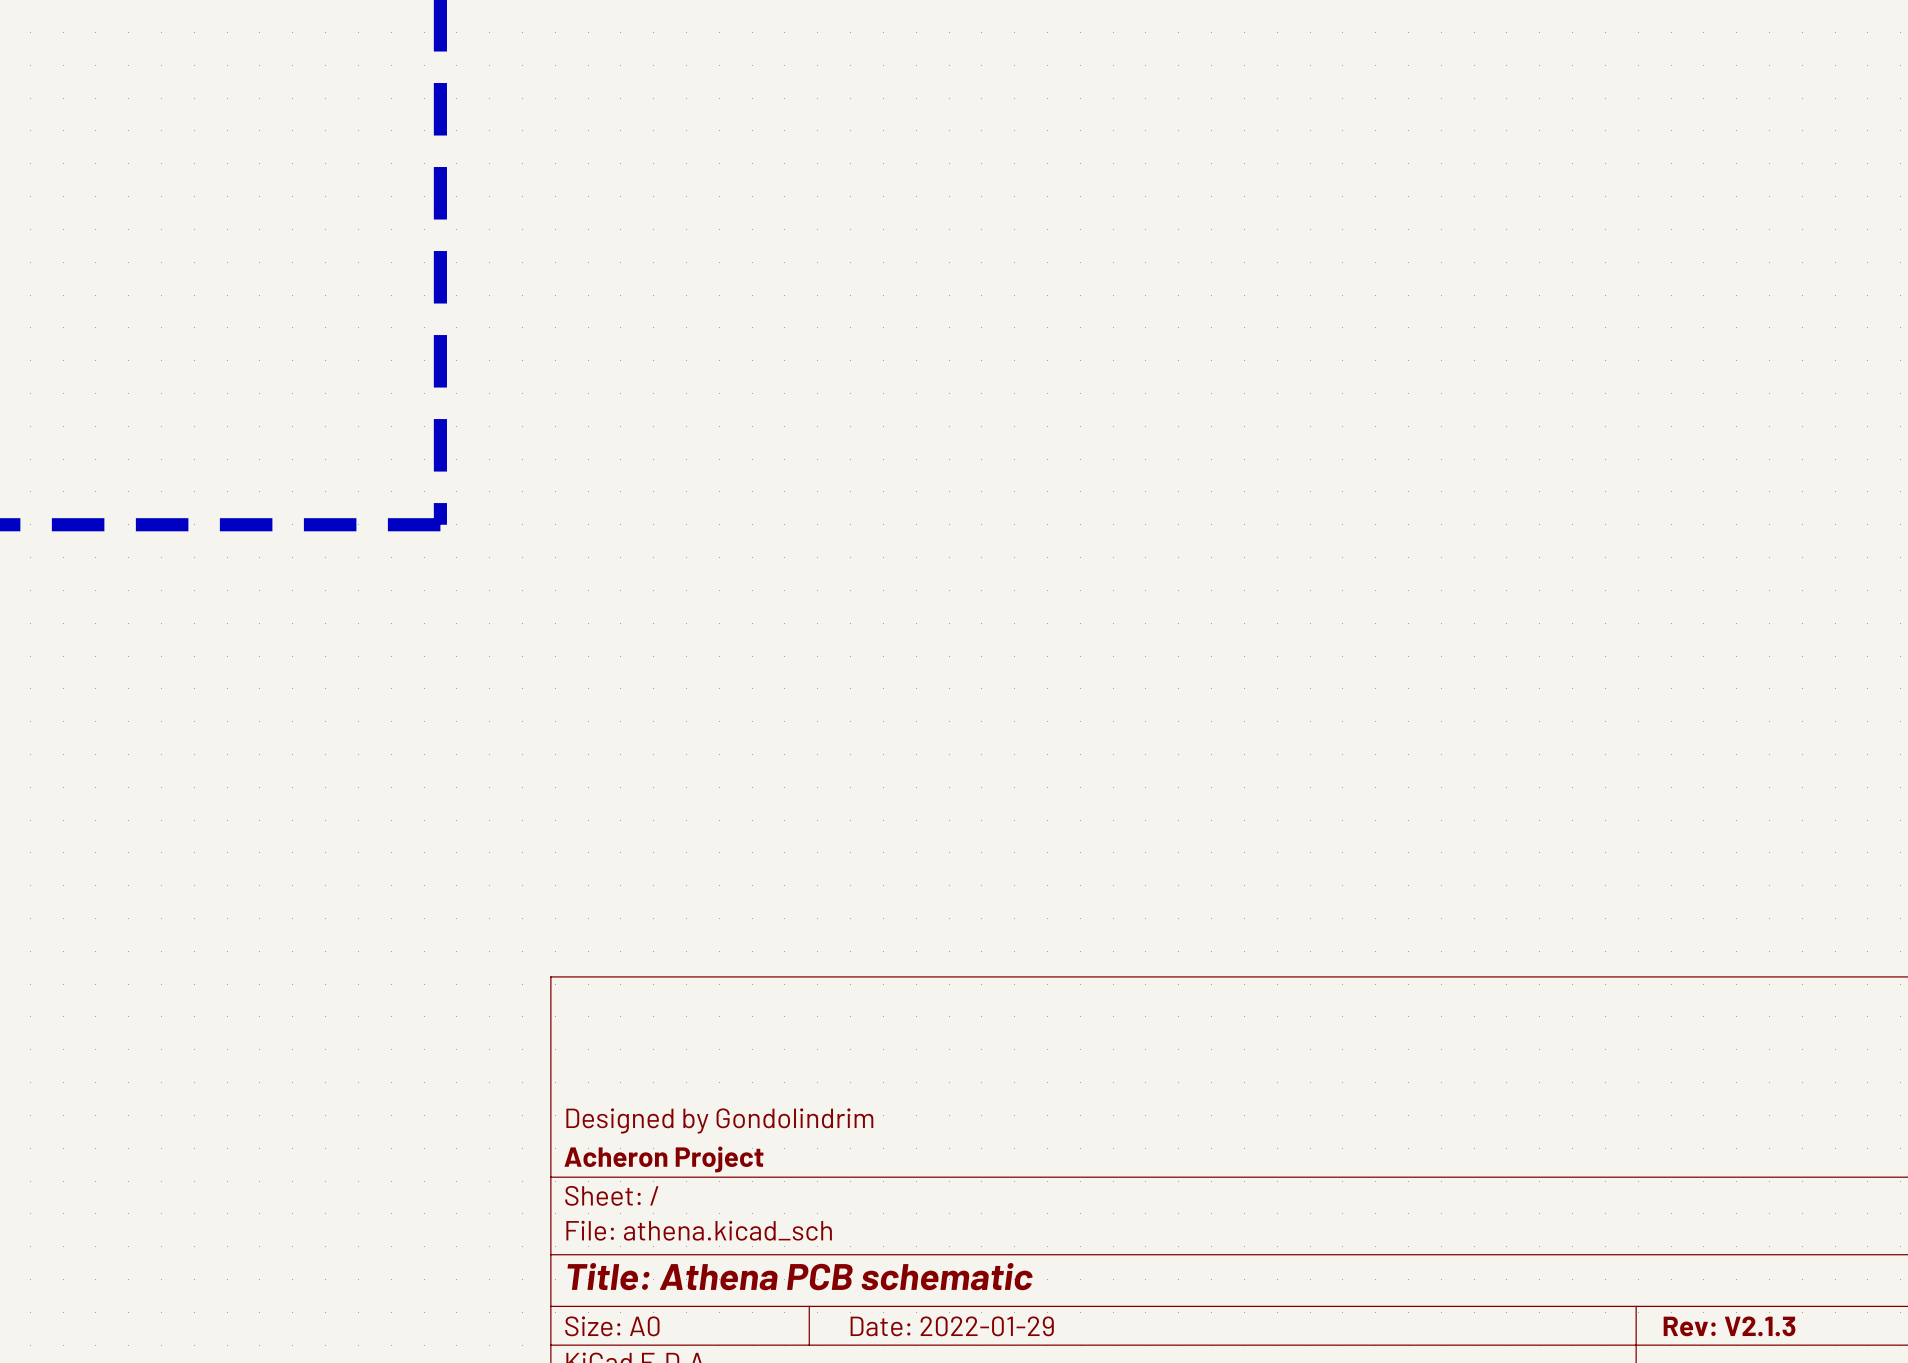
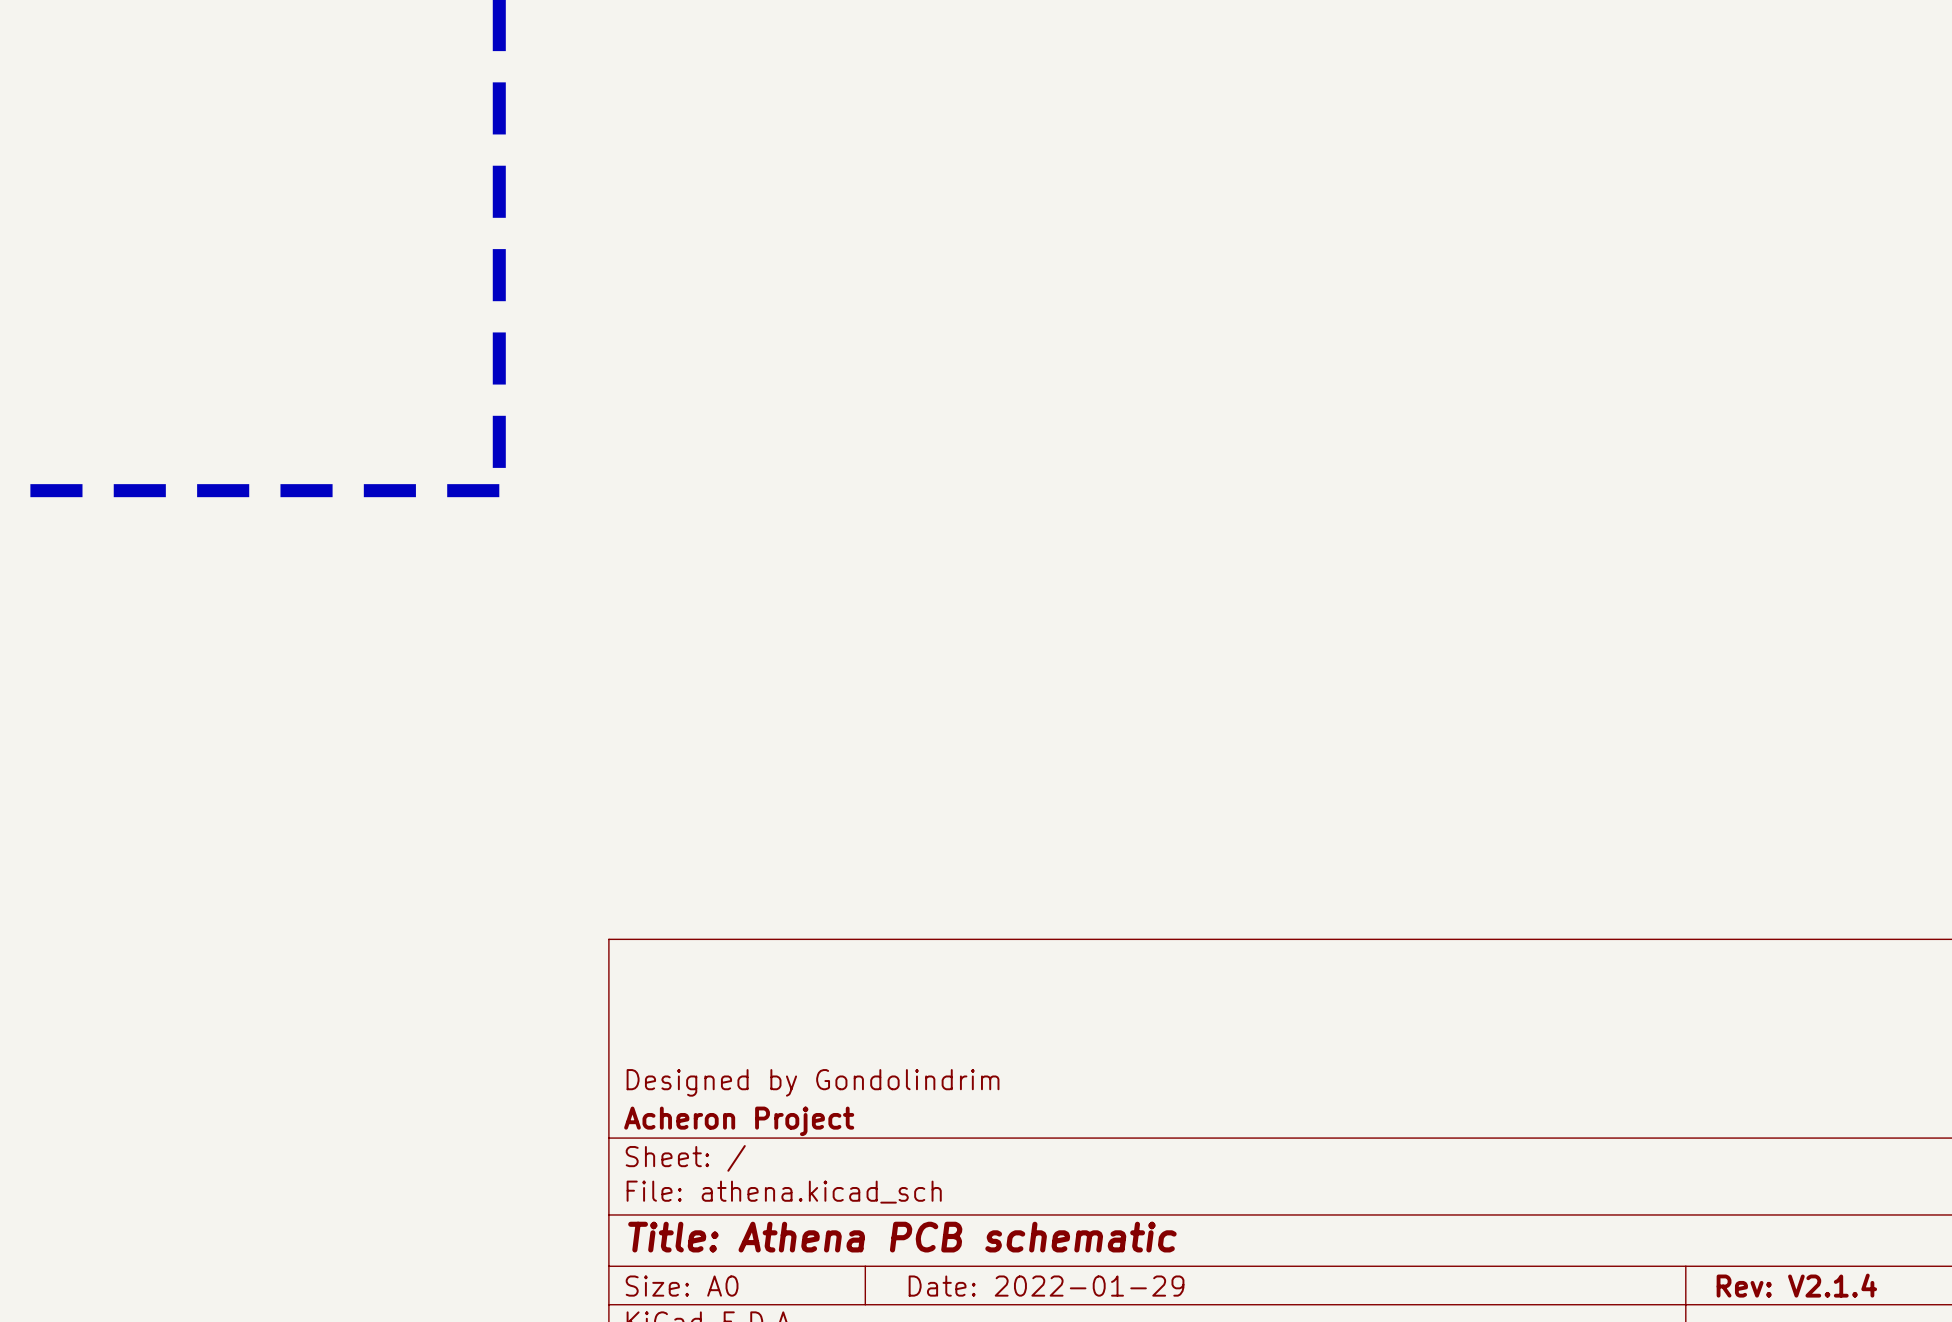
title block: Rev: V2.1.3 (1729, 1326) -> Rev: V2.1.4 (1796, 1285)

